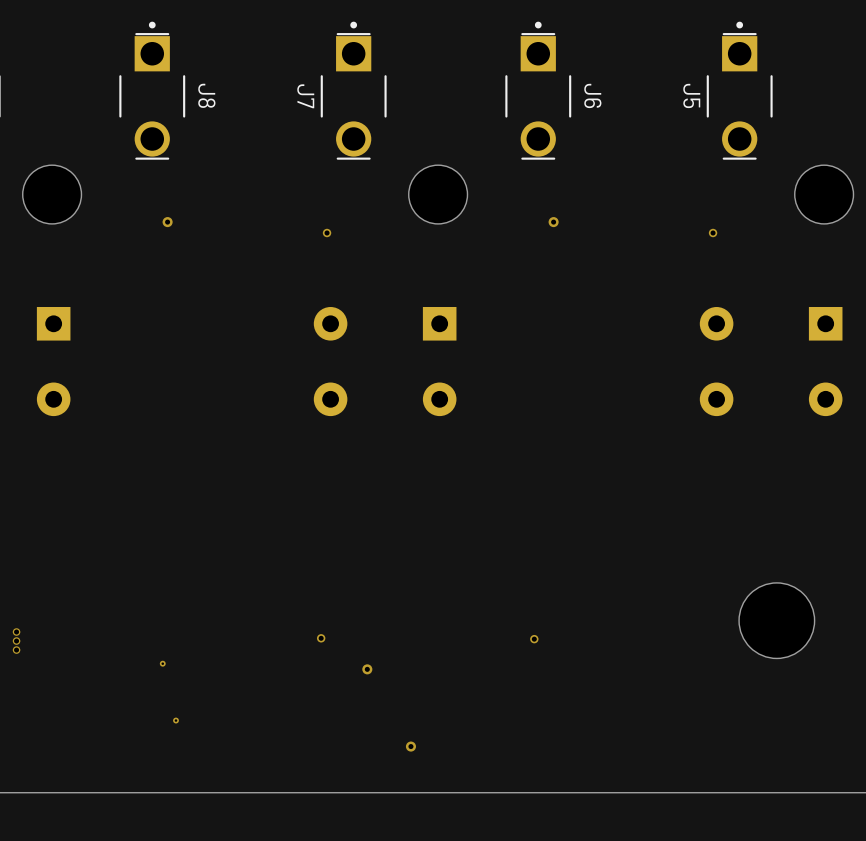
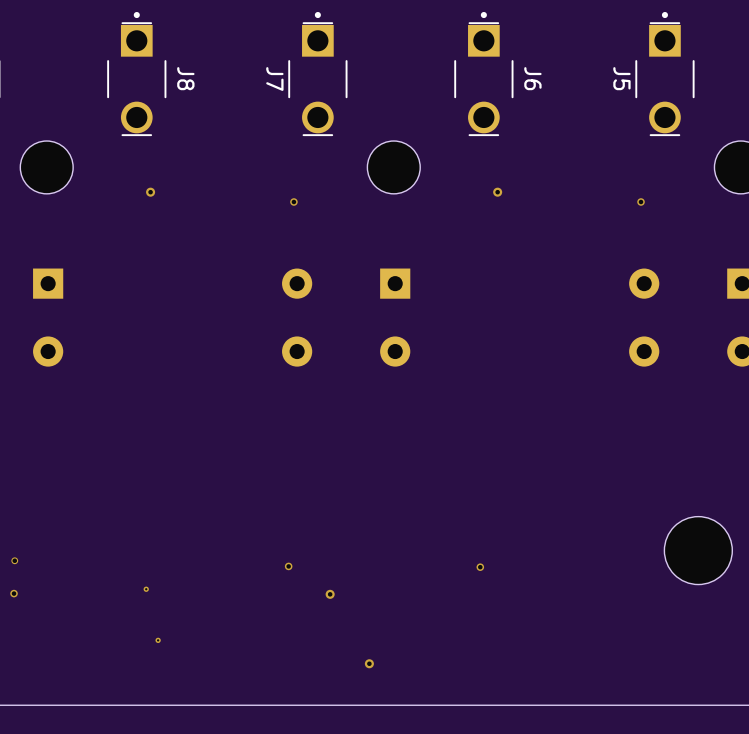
via: (16, 641) -> none
via: (16, 650) -> none
via: none -> (14, 593)

